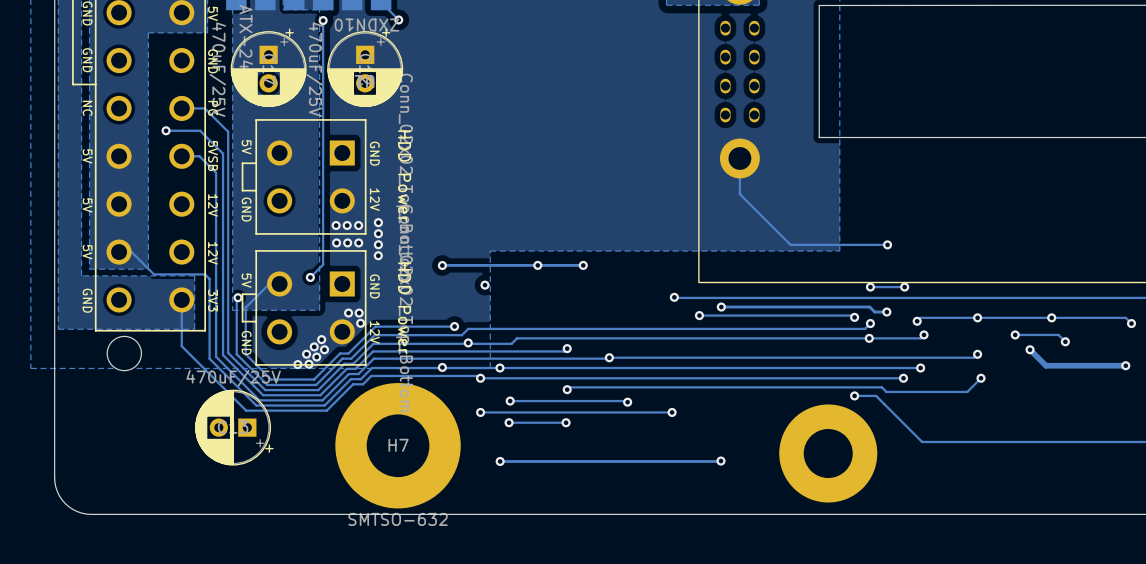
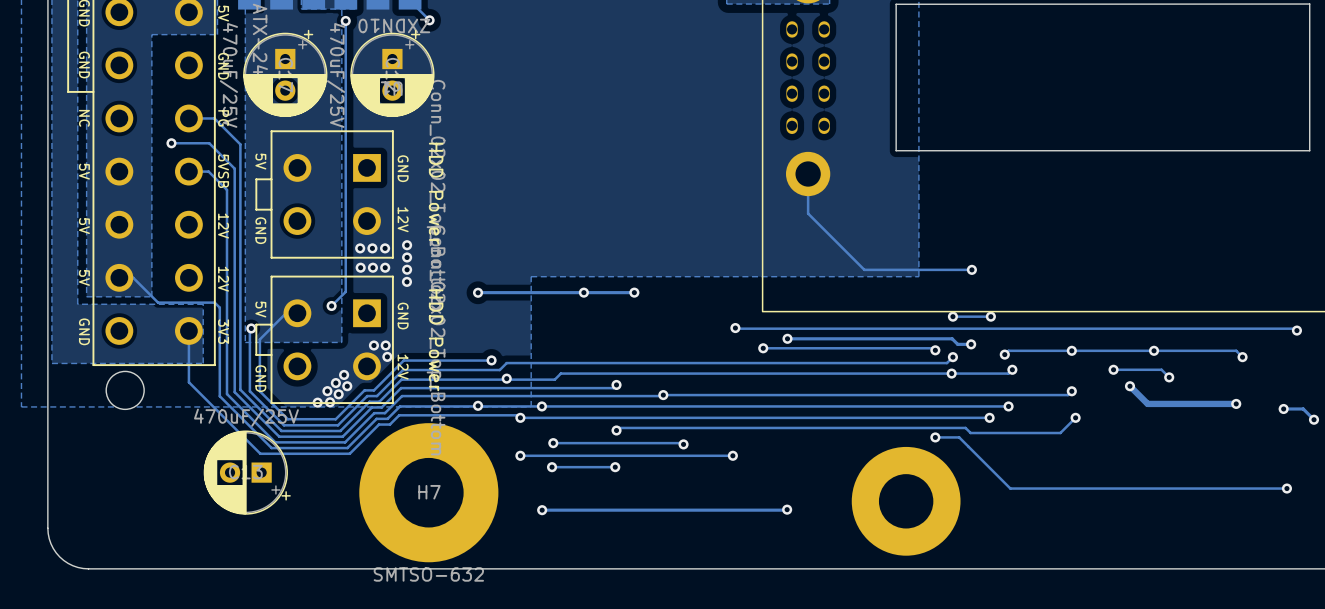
via: (485, 285) -> none

